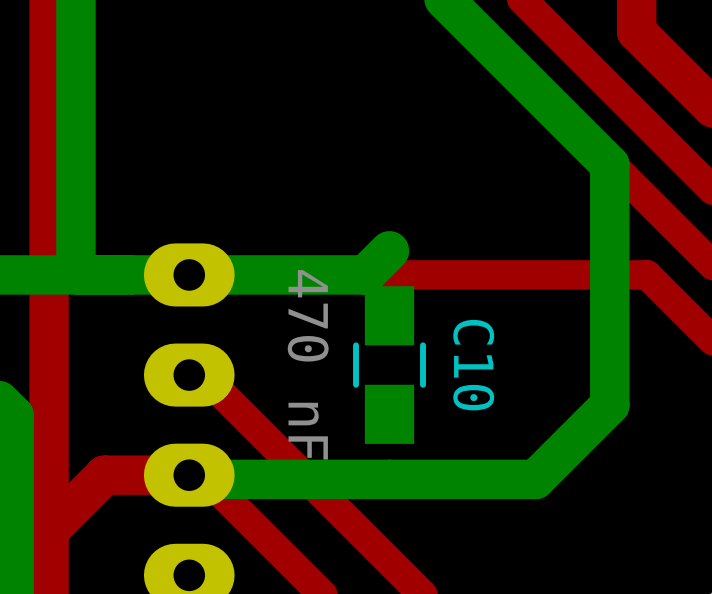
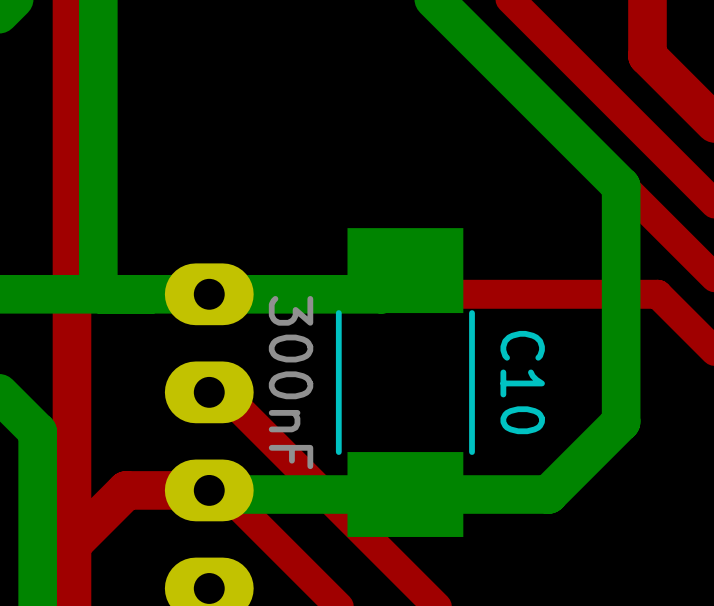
C10 footprint: [353, 286, 426, 444] -> [335, 228, 475, 537]
C10 value: 470 nF (308, 364) -> 300nF (291, 382)

